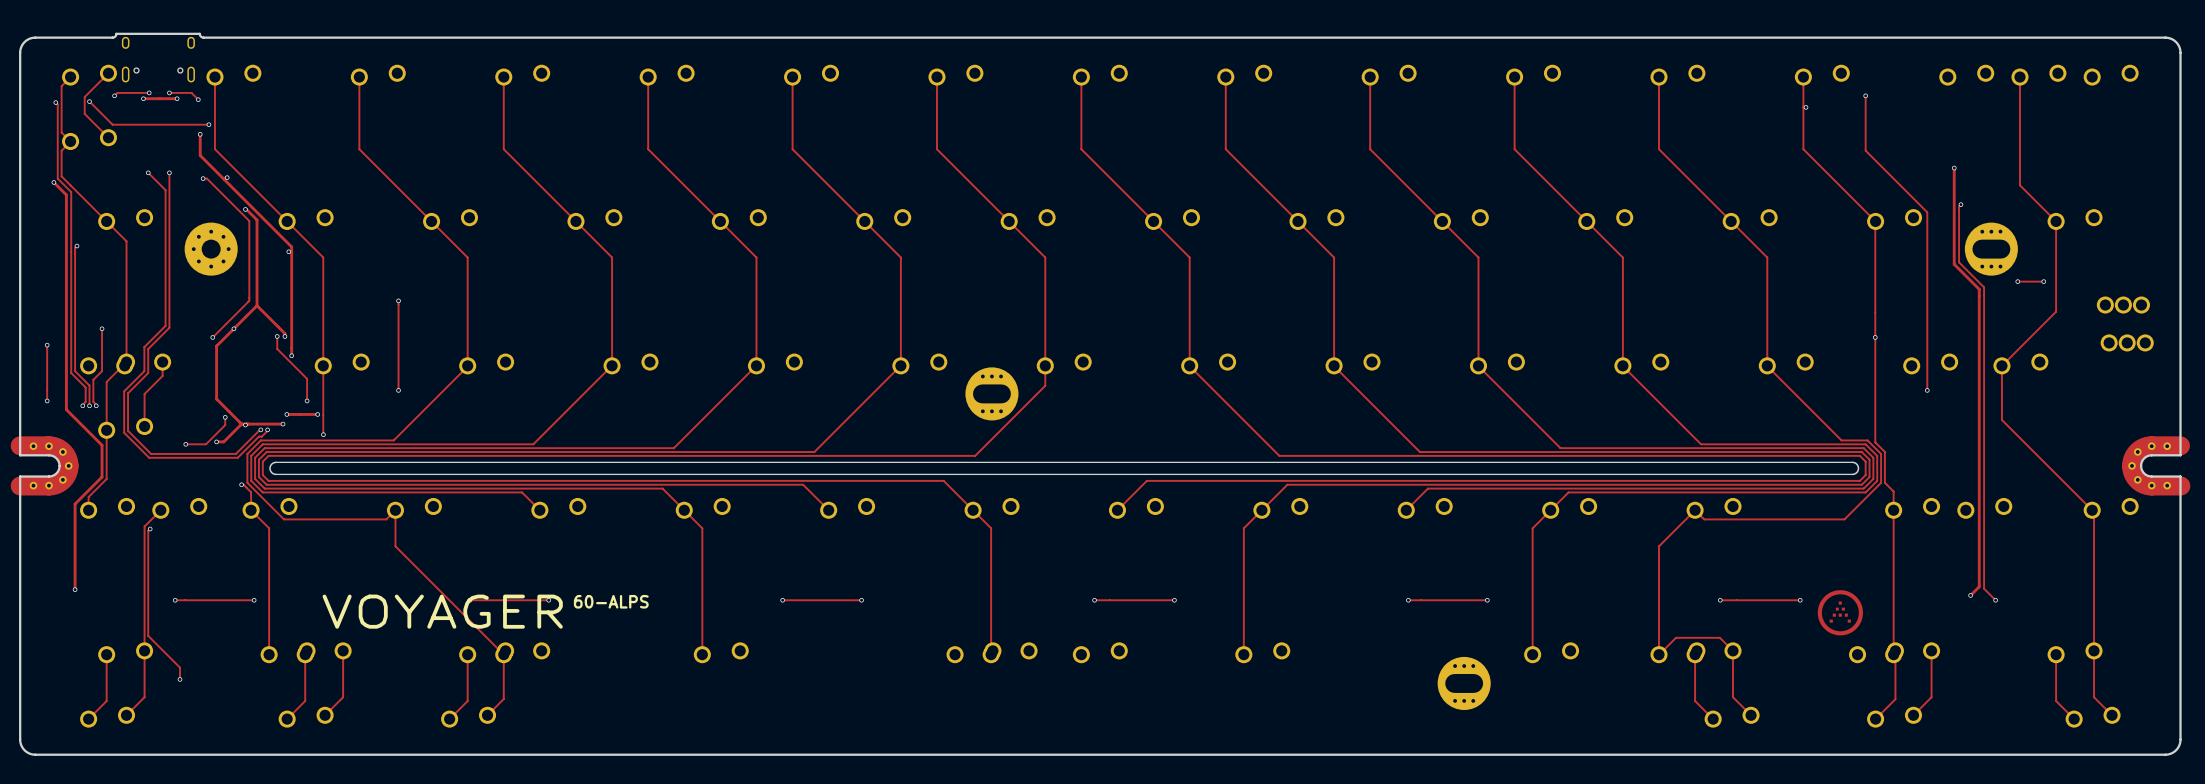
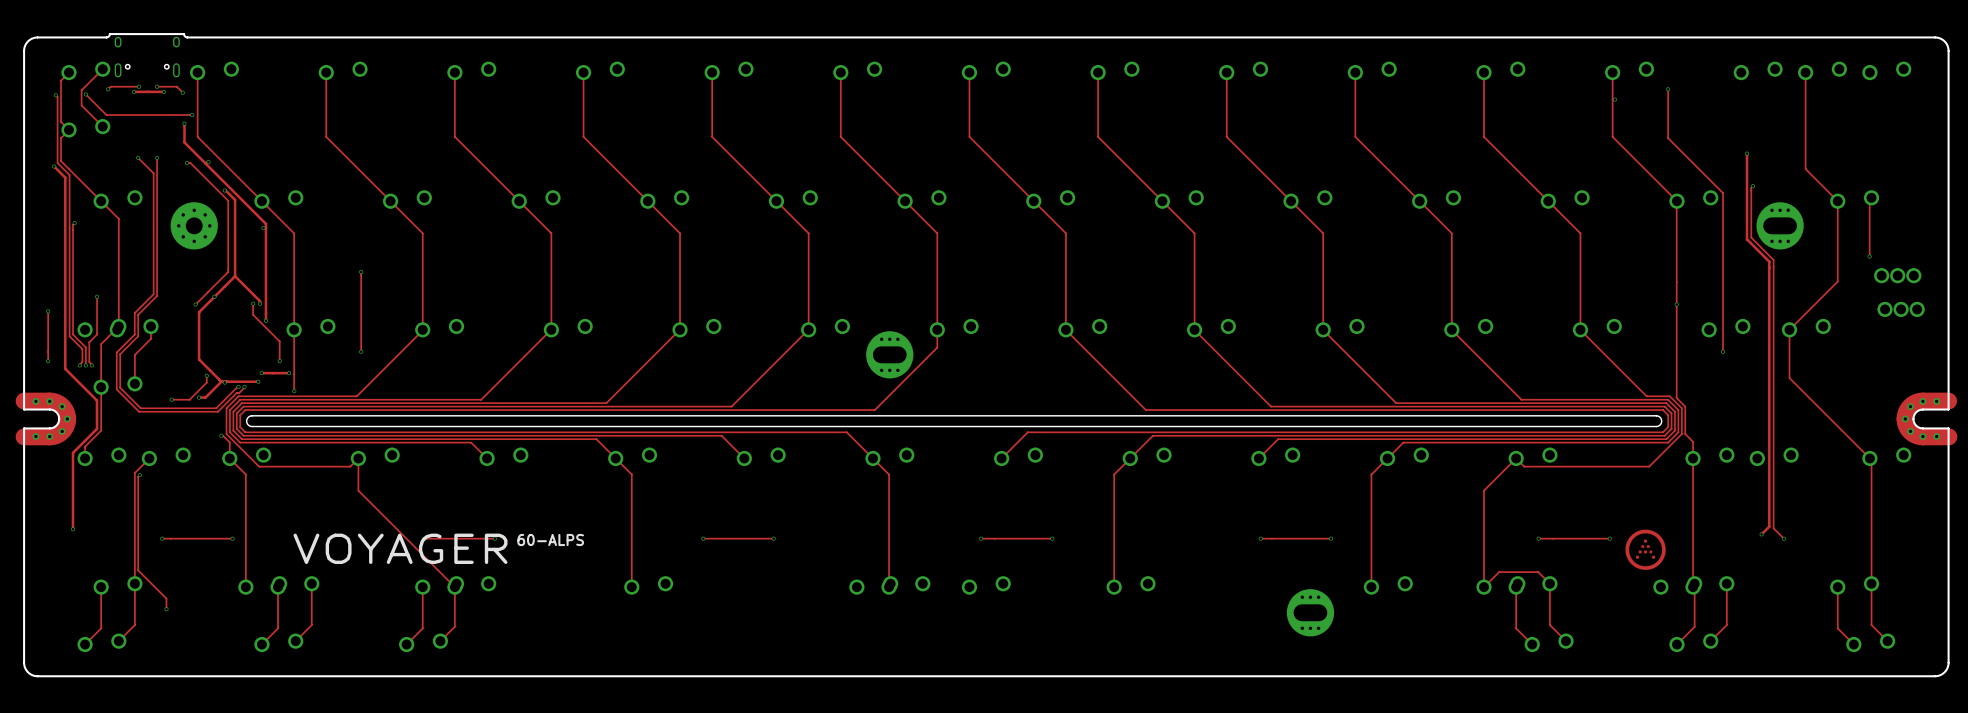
track: none -> (1871, 197) (1869, 199) (1869, 256)
track: (2017, 281) (2043, 281) -> none
via: (2017, 281) -> none
via: (2043, 281) -> none
via: none -> (1869, 256)

